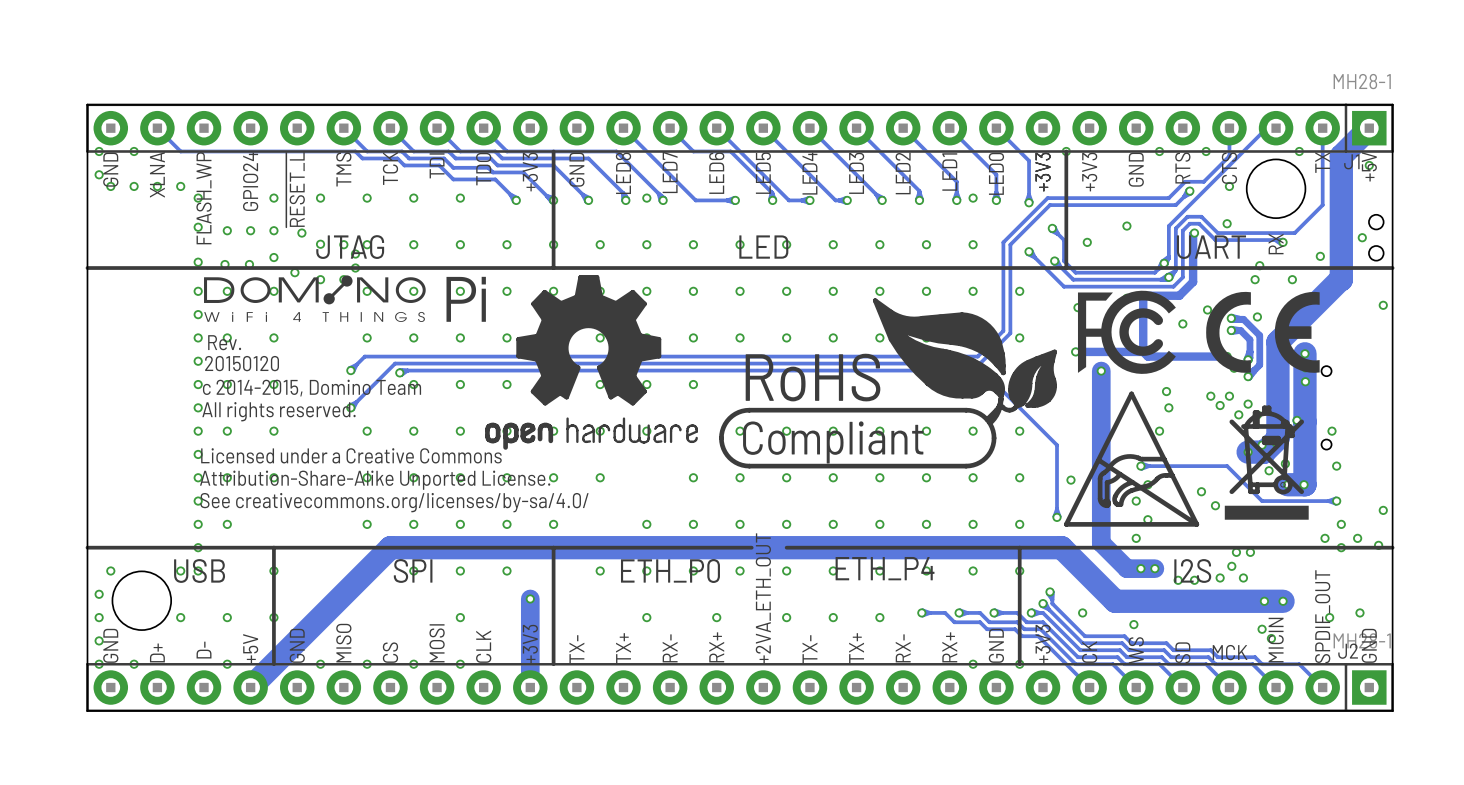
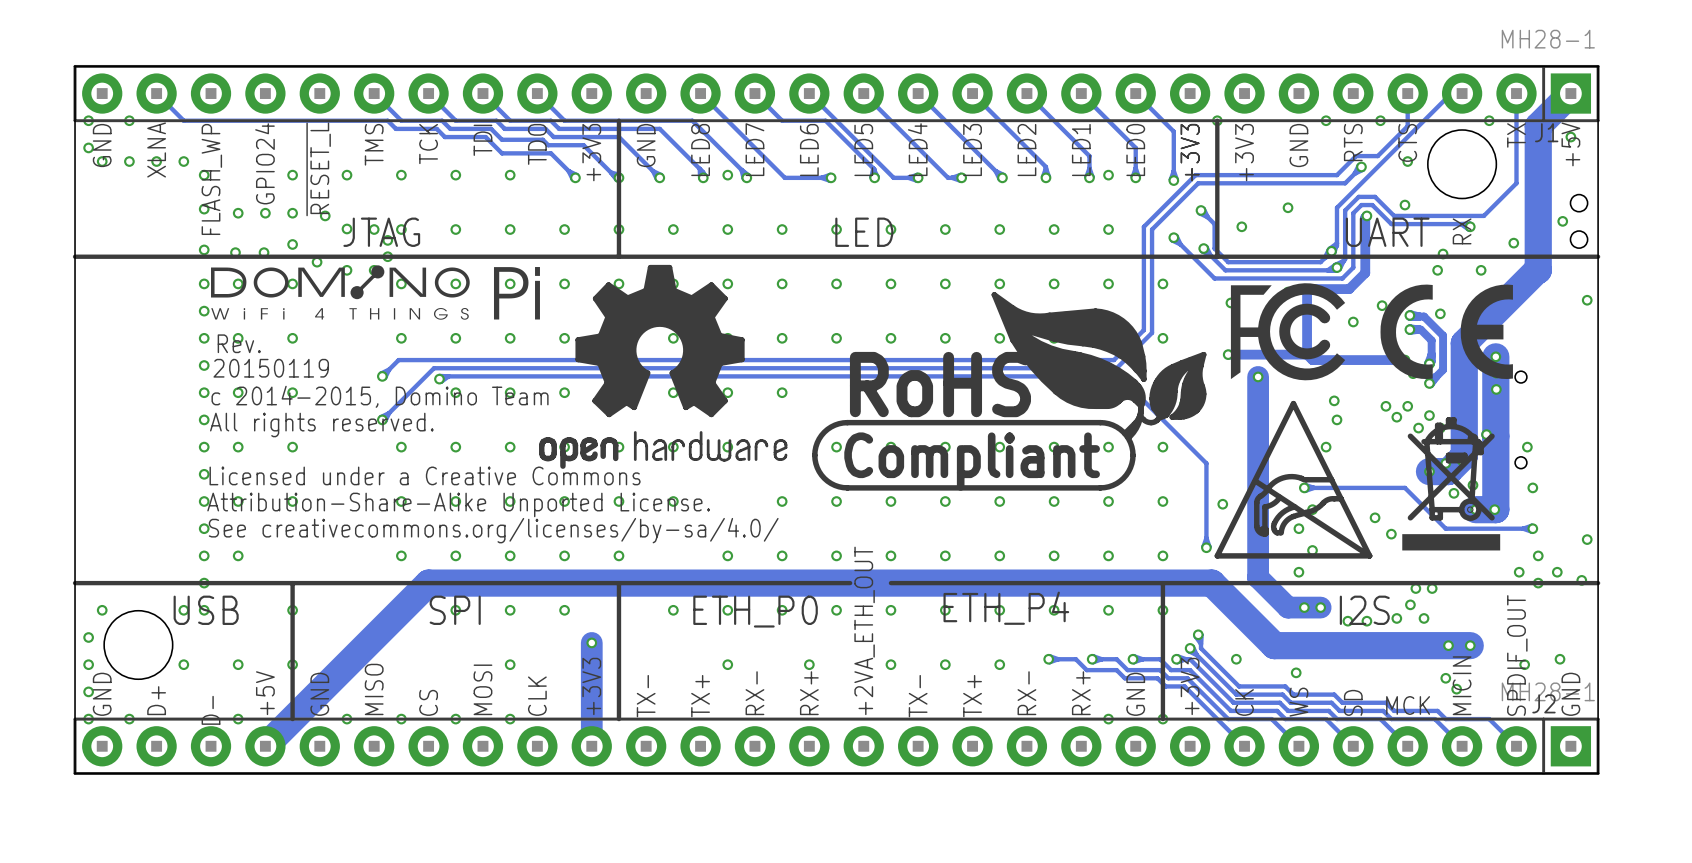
text: 20150120 (242, 363) -> 20150119 (271, 368)

